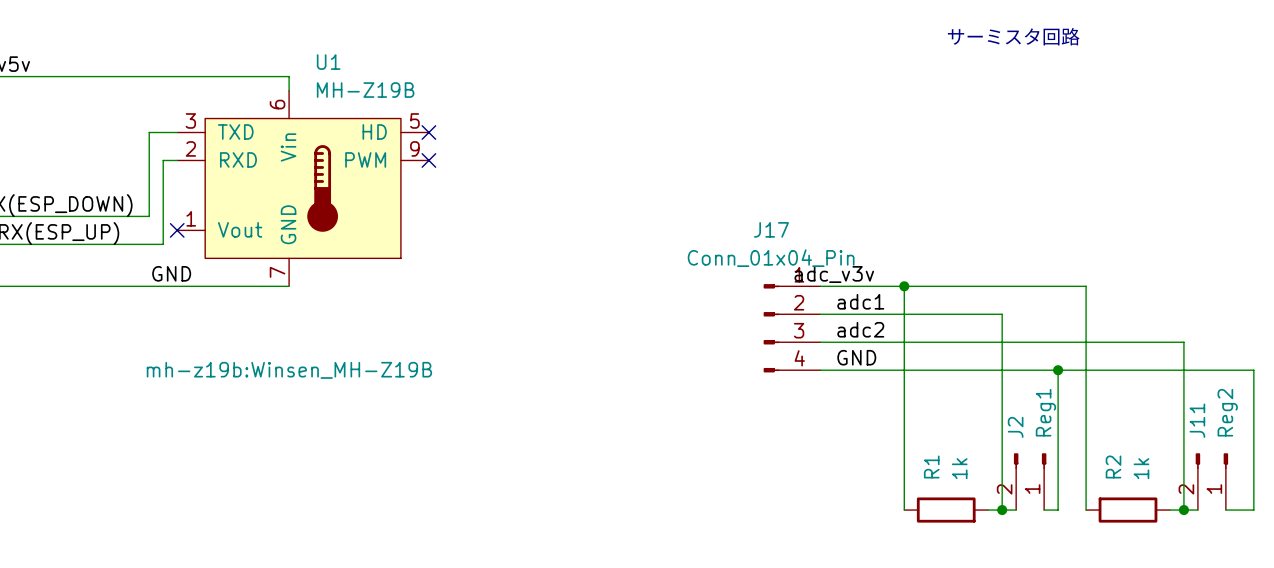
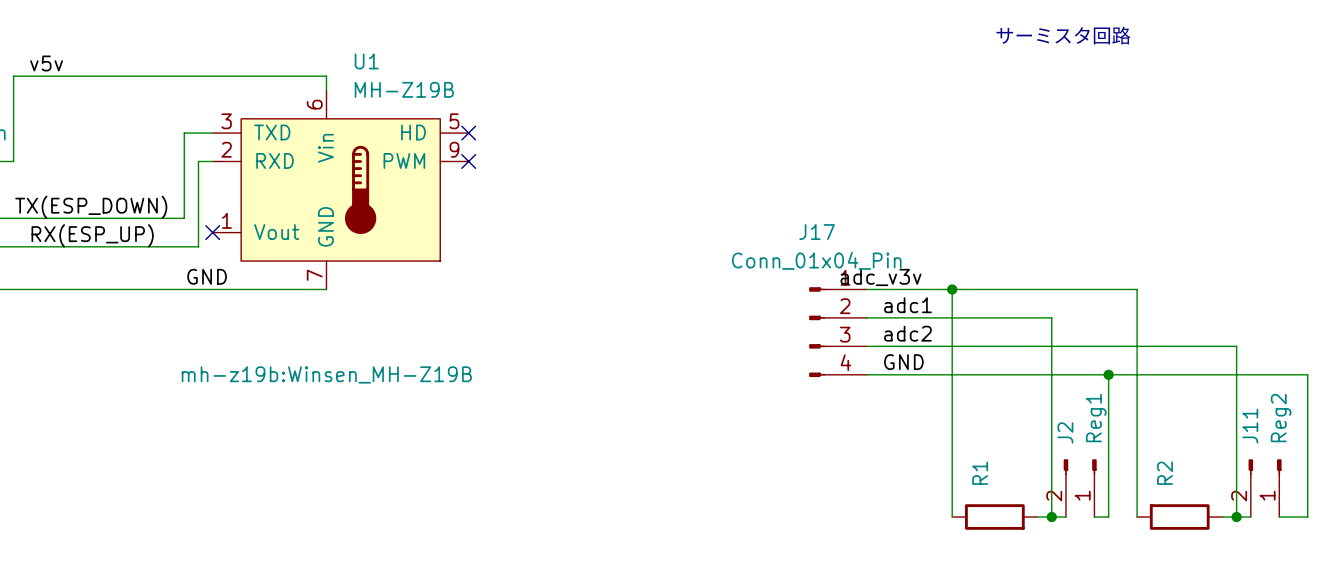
R1 value: 1k (959, 468) -> none
R2 value: 1k (1141, 468) -> none

